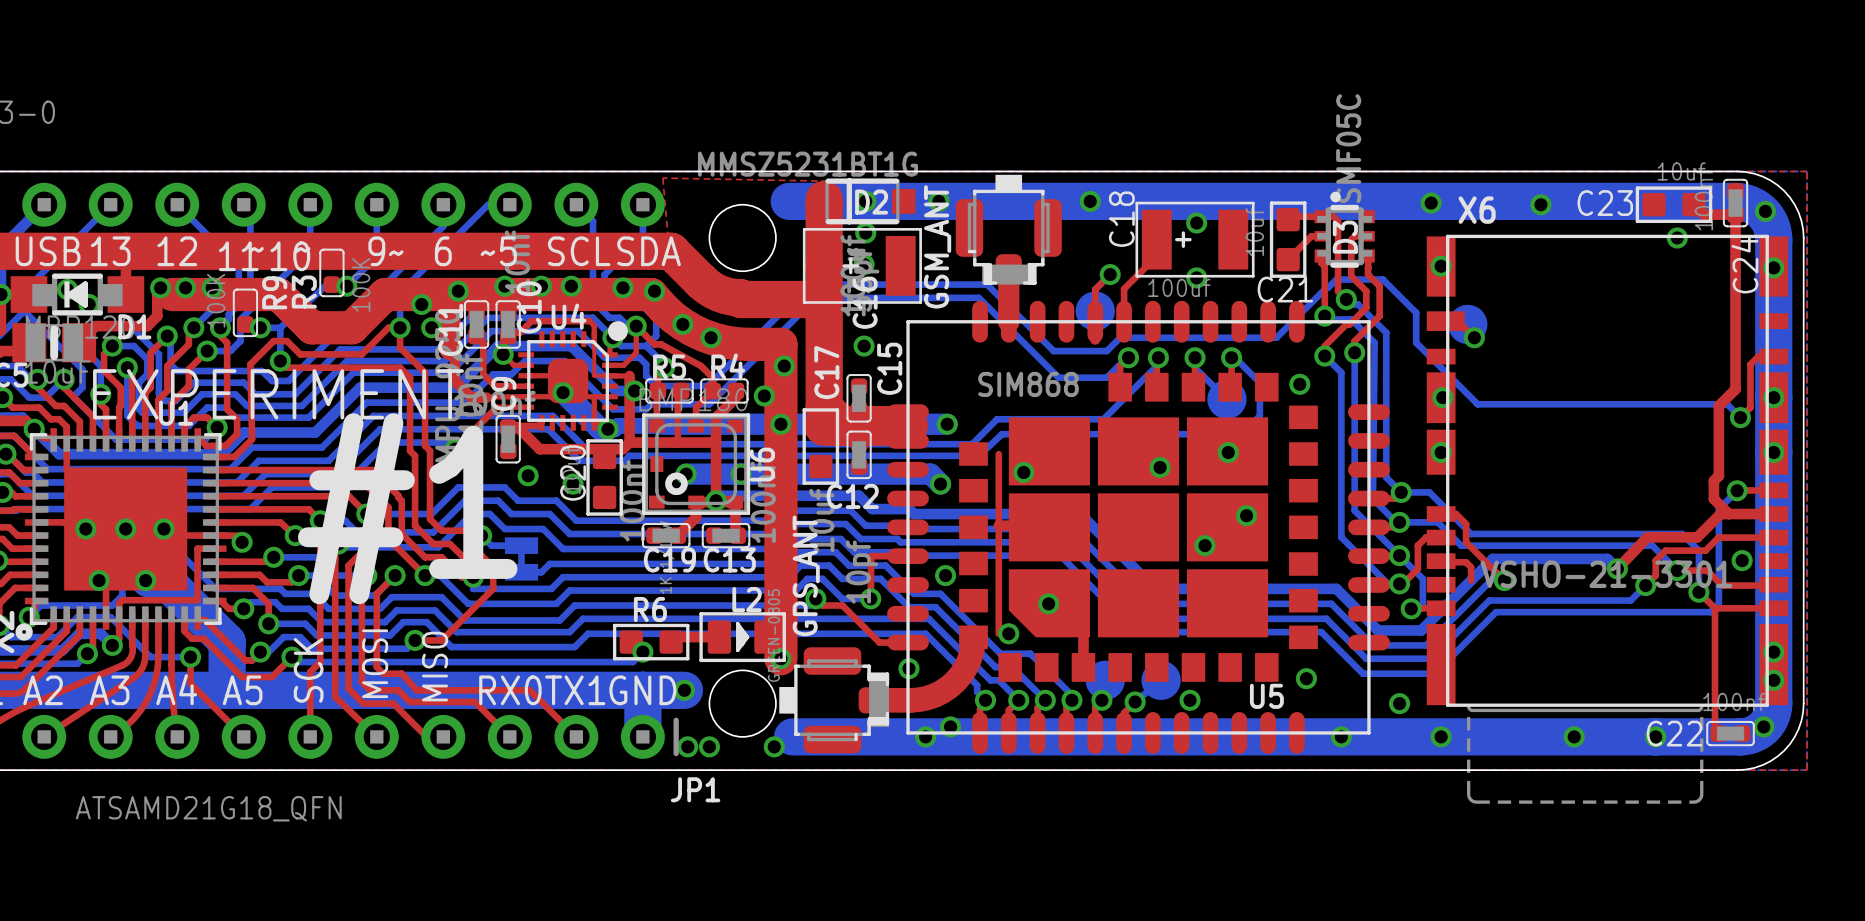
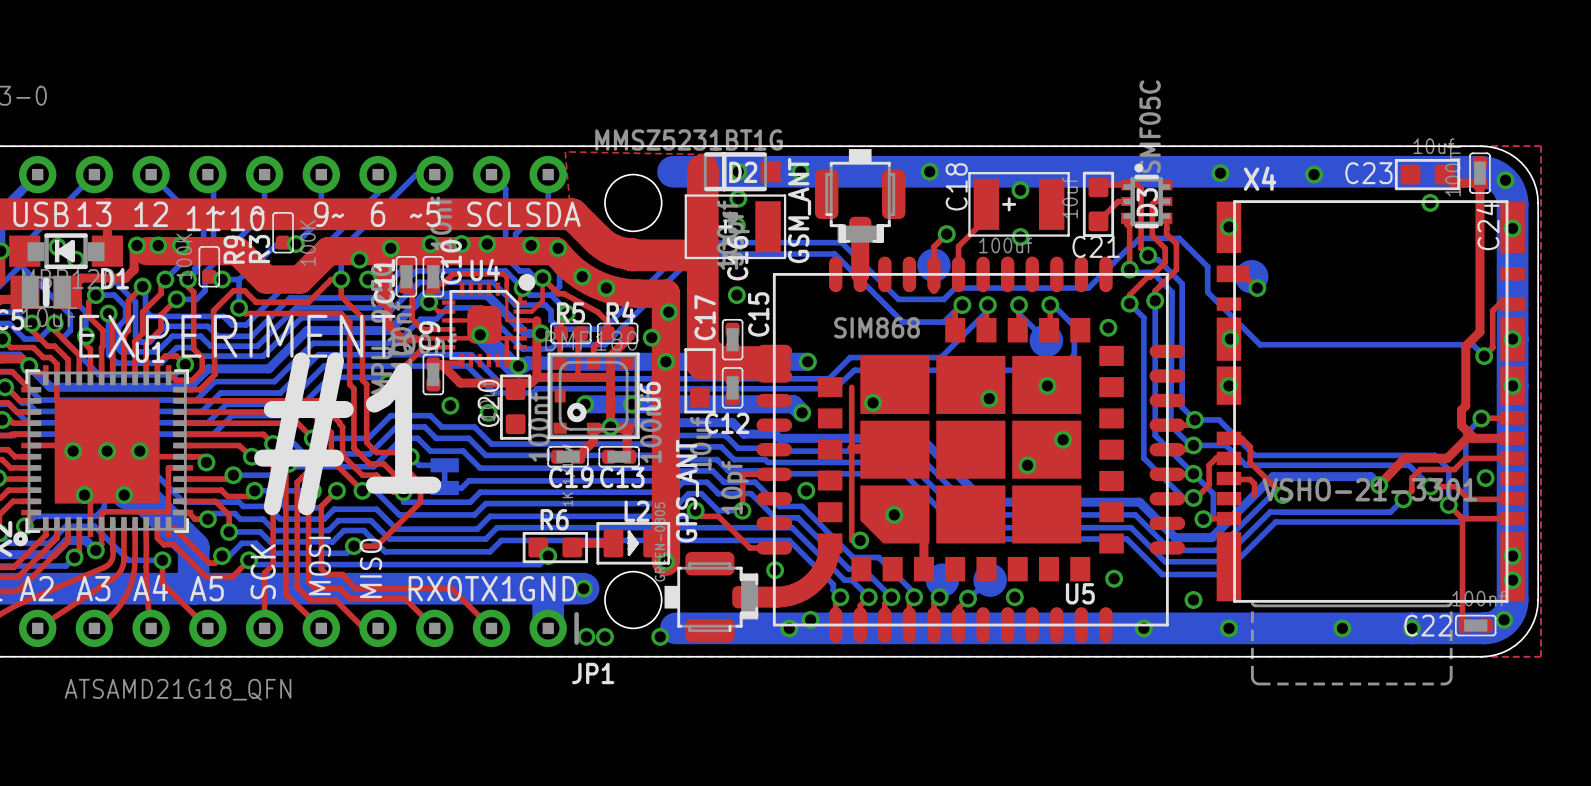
X6 name: X6 (1477, 210) -> X4 (1260, 178)

